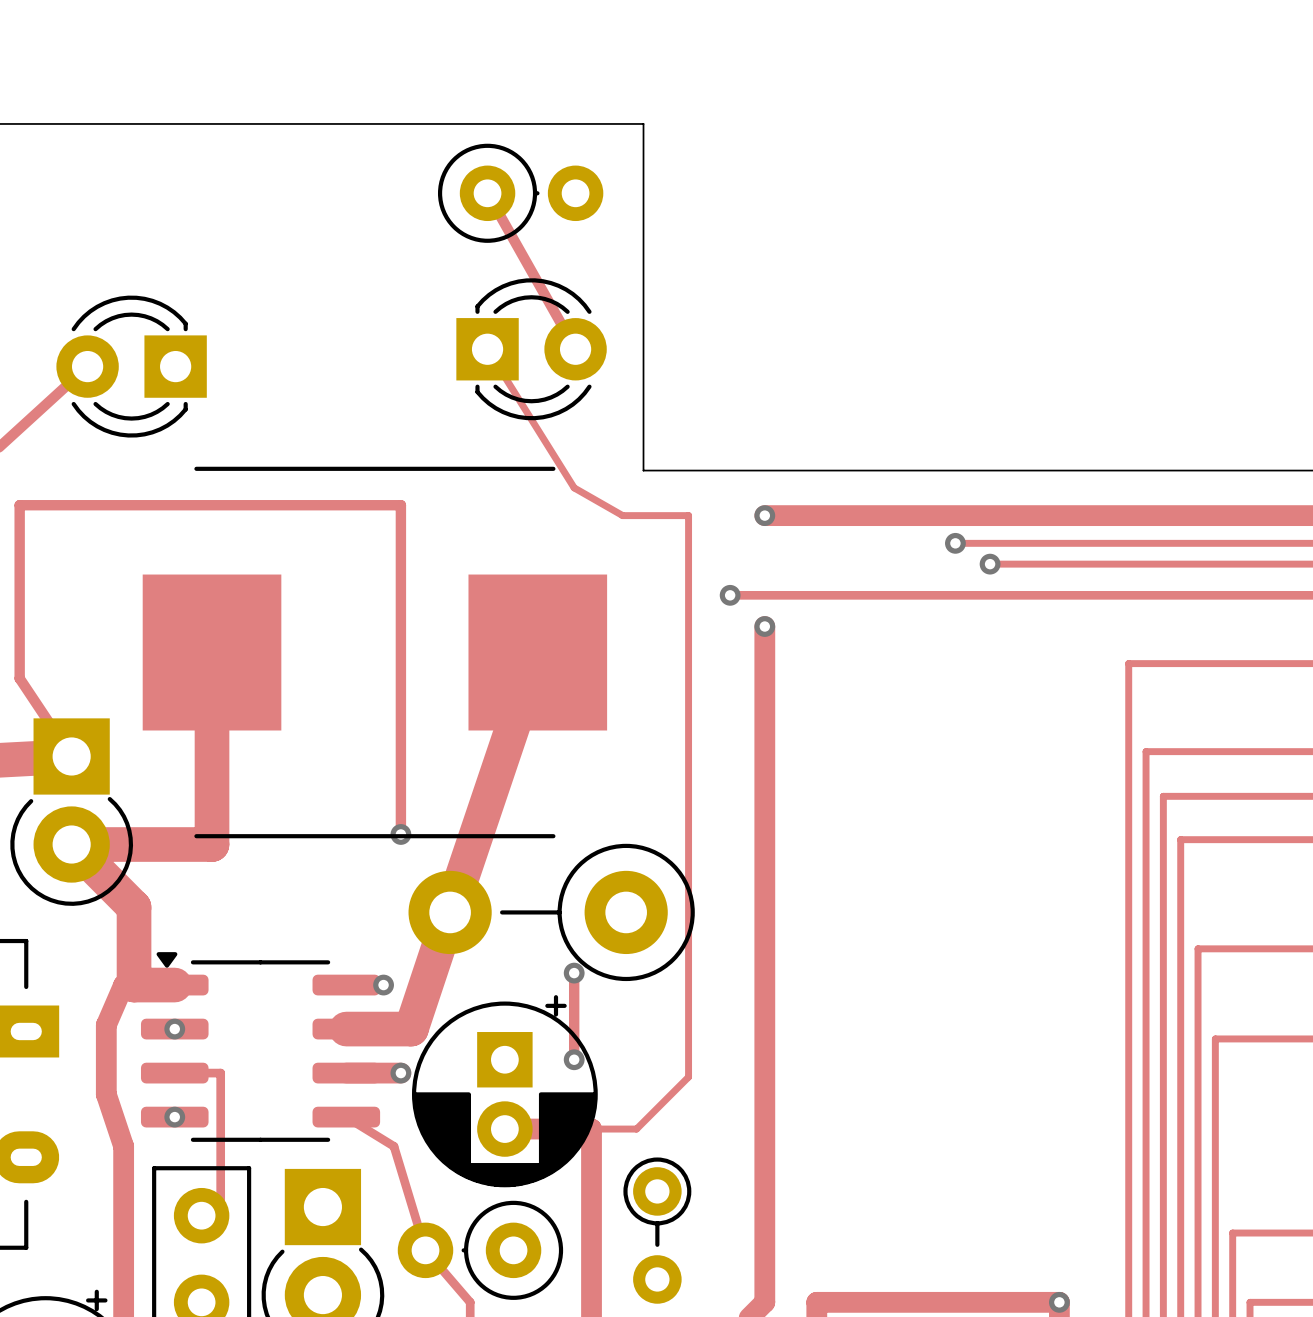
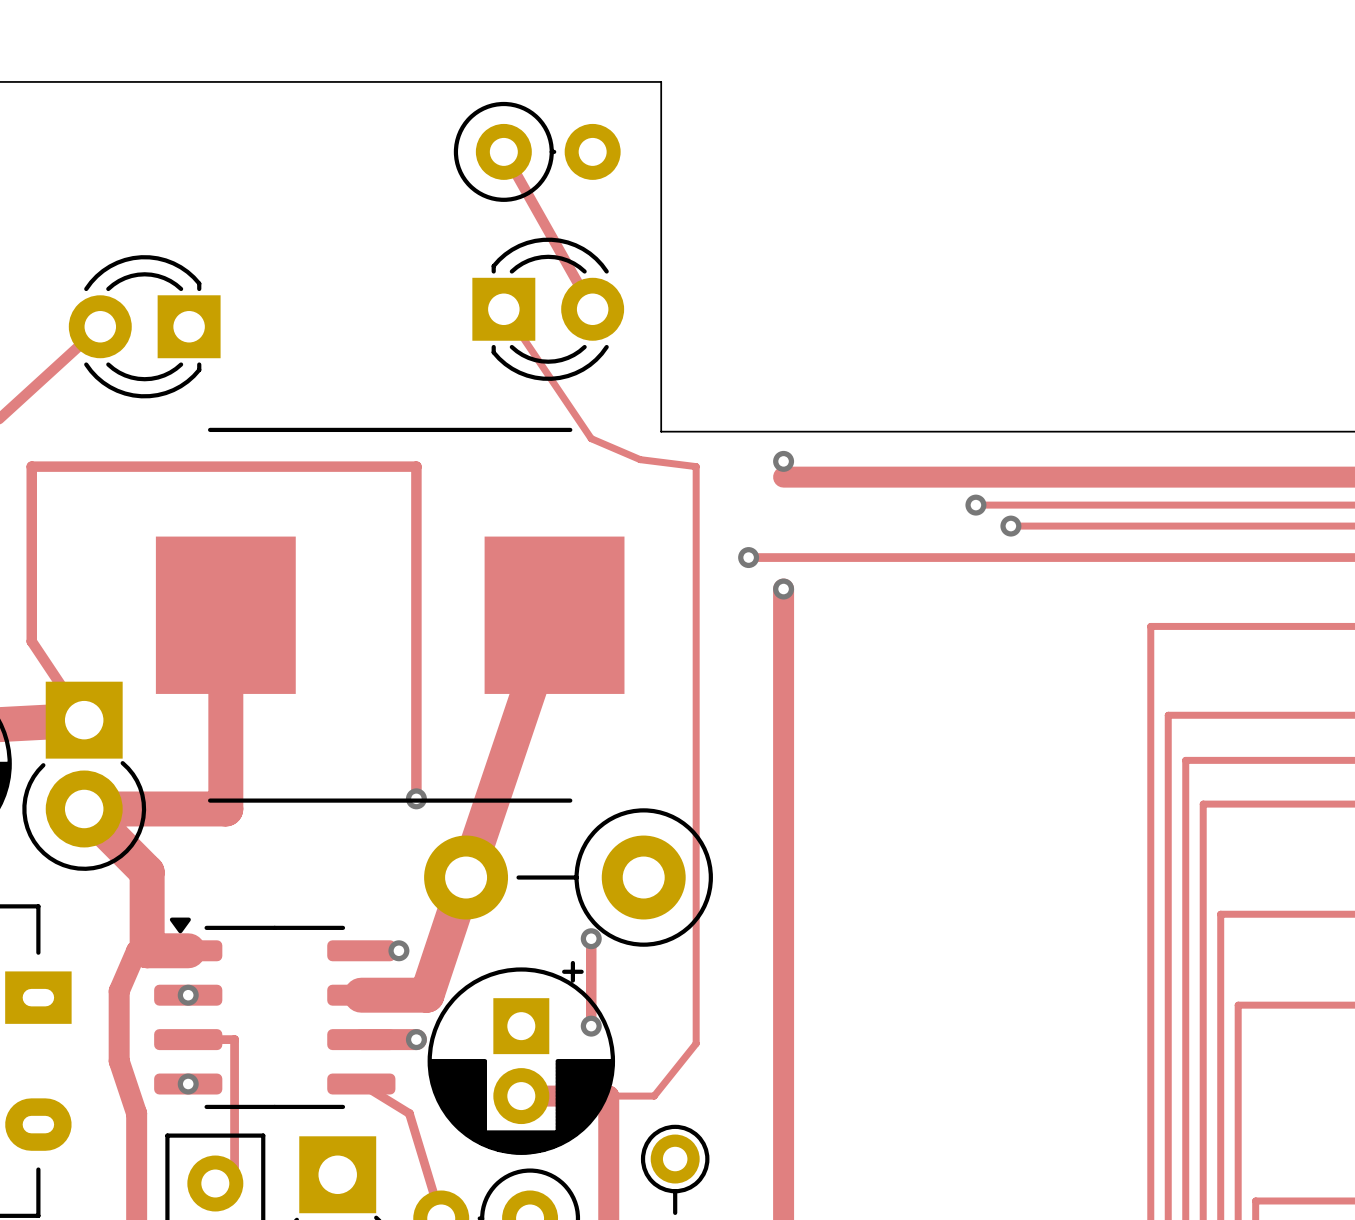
track: (487, 349) (574, 487) (622, 515) (688, 515) (688, 1077) (636, 1129) -> (503, 309) (591, 438) (640, 459) (696, 466) (696, 1043) (654, 1096)
via position: (764, 515) -> (783, 461)

